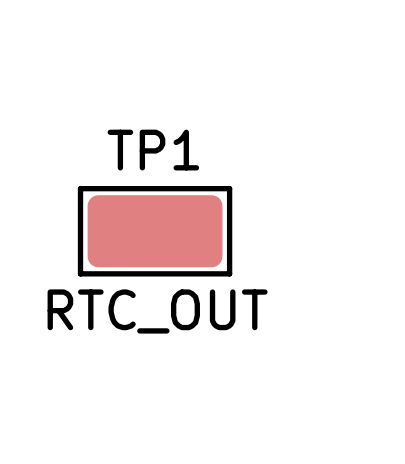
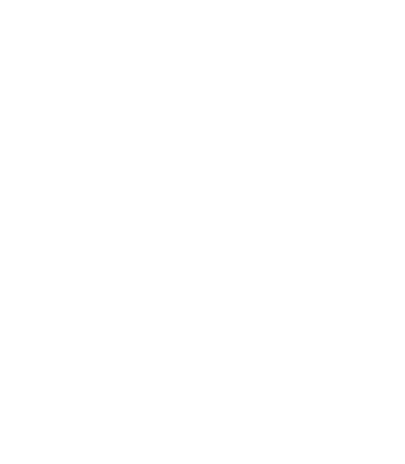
TP1: RTC_OUT (155, 231) -> none

